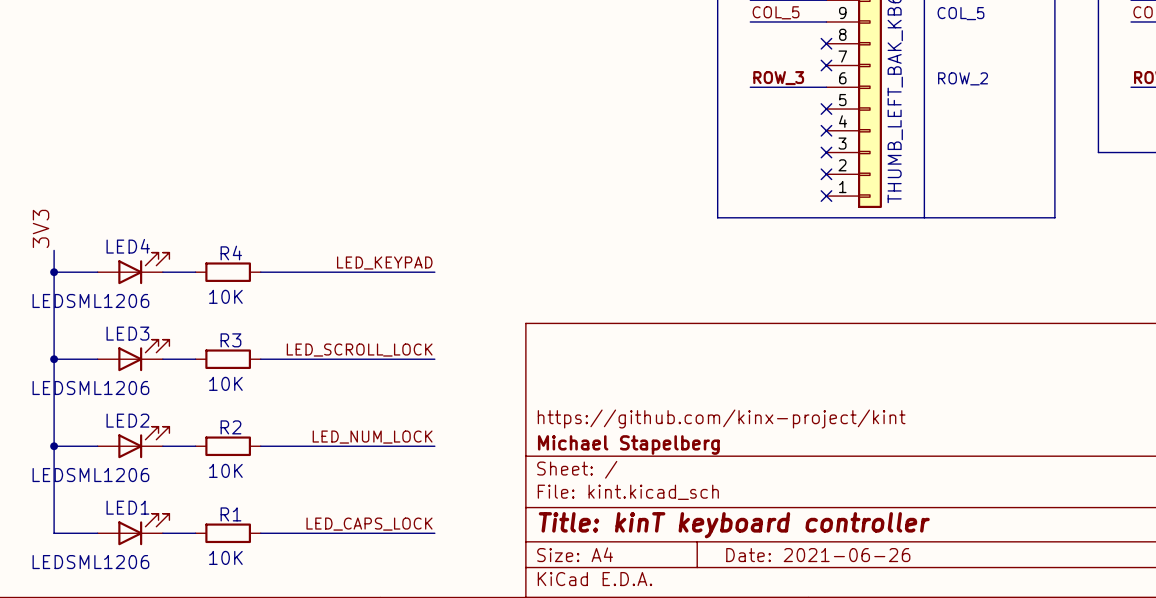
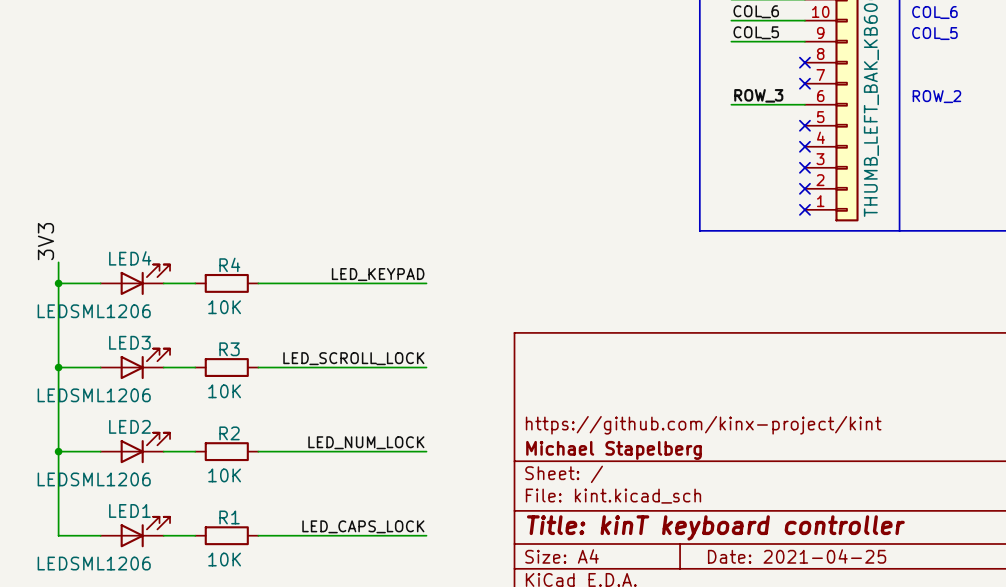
title block: Date: 2021-06-26 (818, 555) -> Date: 2021-04-25 (797, 556)

